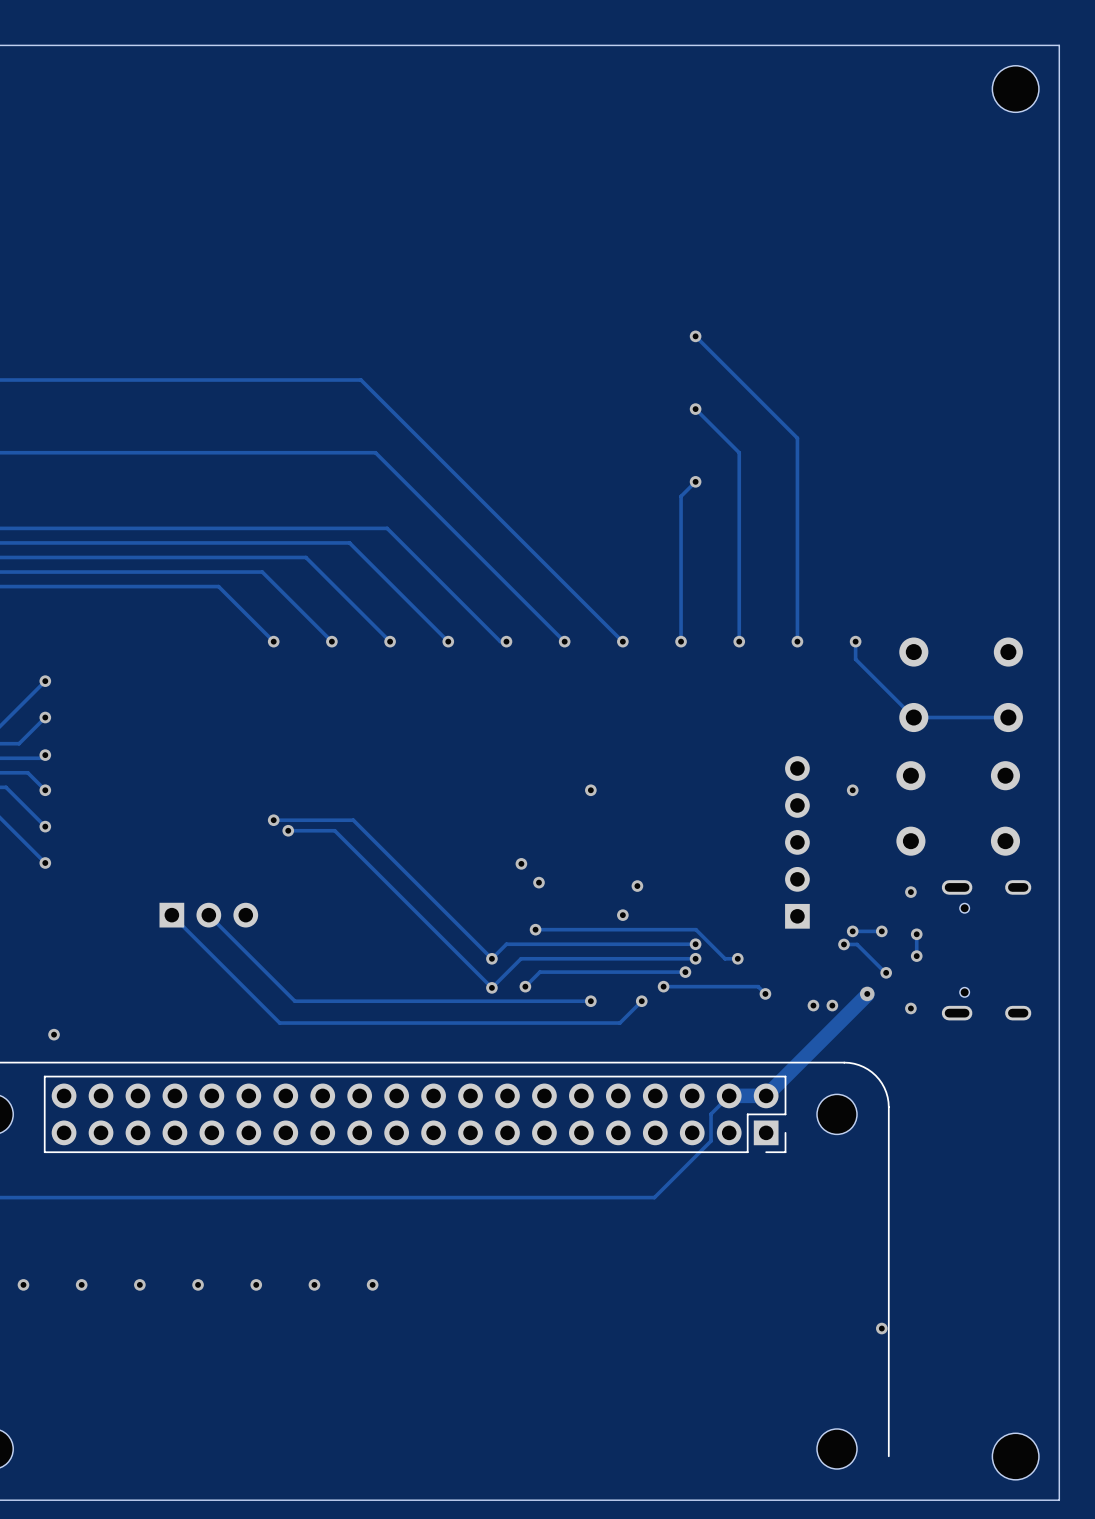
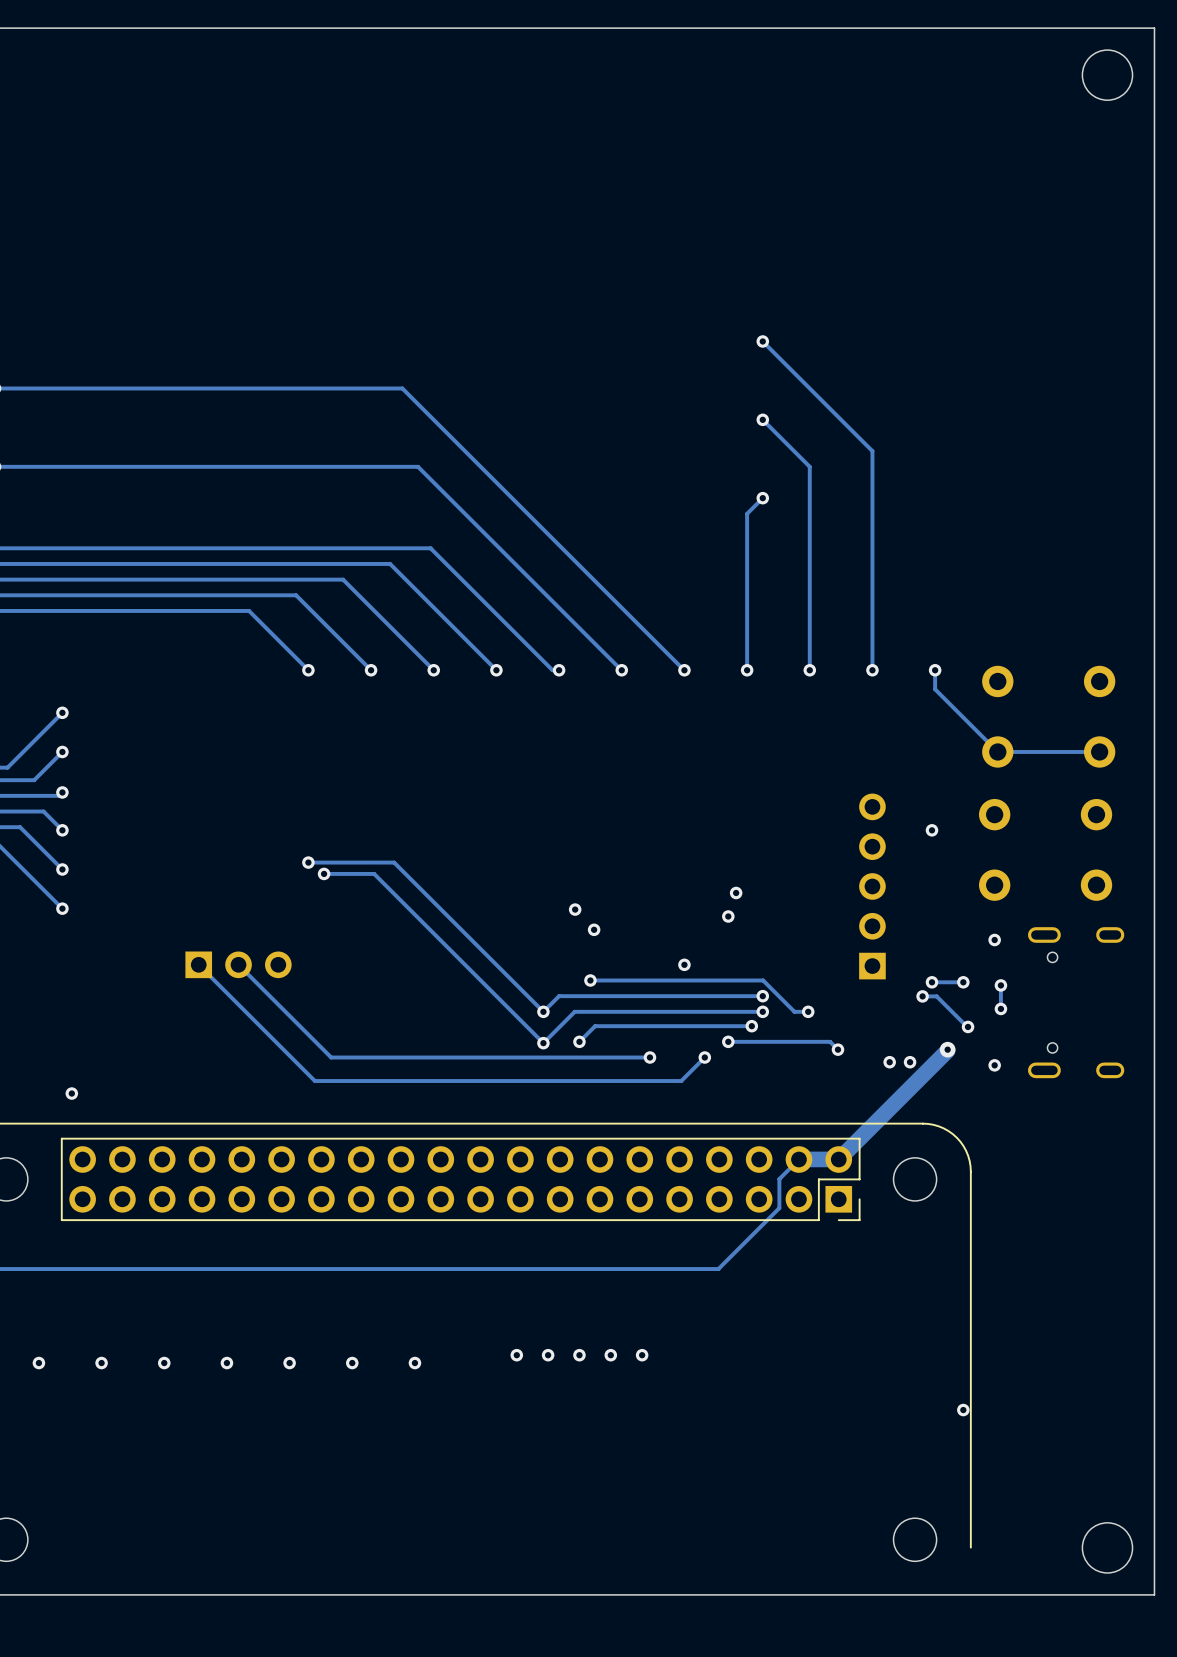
via: (590, 790) -> none
via: none -> (736, 892)
via: none -> (728, 916)
via: (637, 886) -> none
via: none -> (516, 1355)
via: none -> (548, 1355)
via: none -> (579, 1355)
via: none -> (610, 1355)
via: none -> (642, 1355)

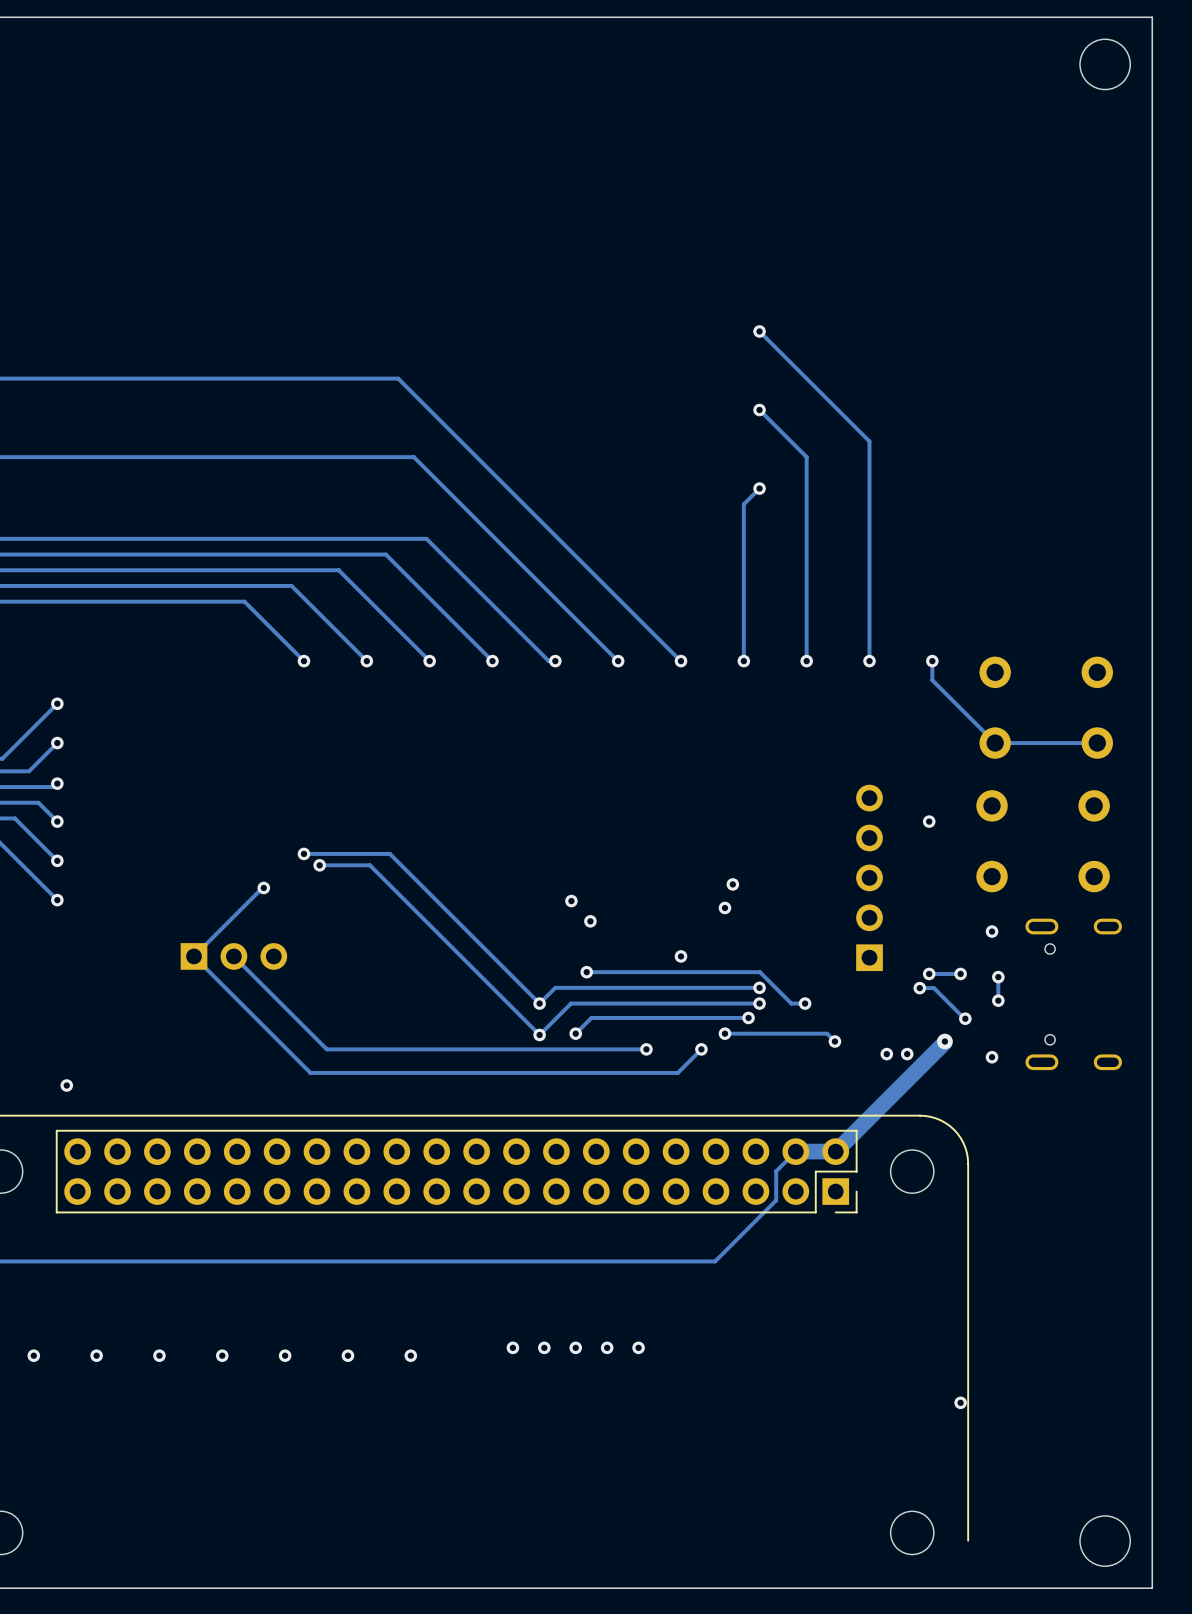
track: none -> (263, 887) (194, 956)
via: none -> (263, 887)

